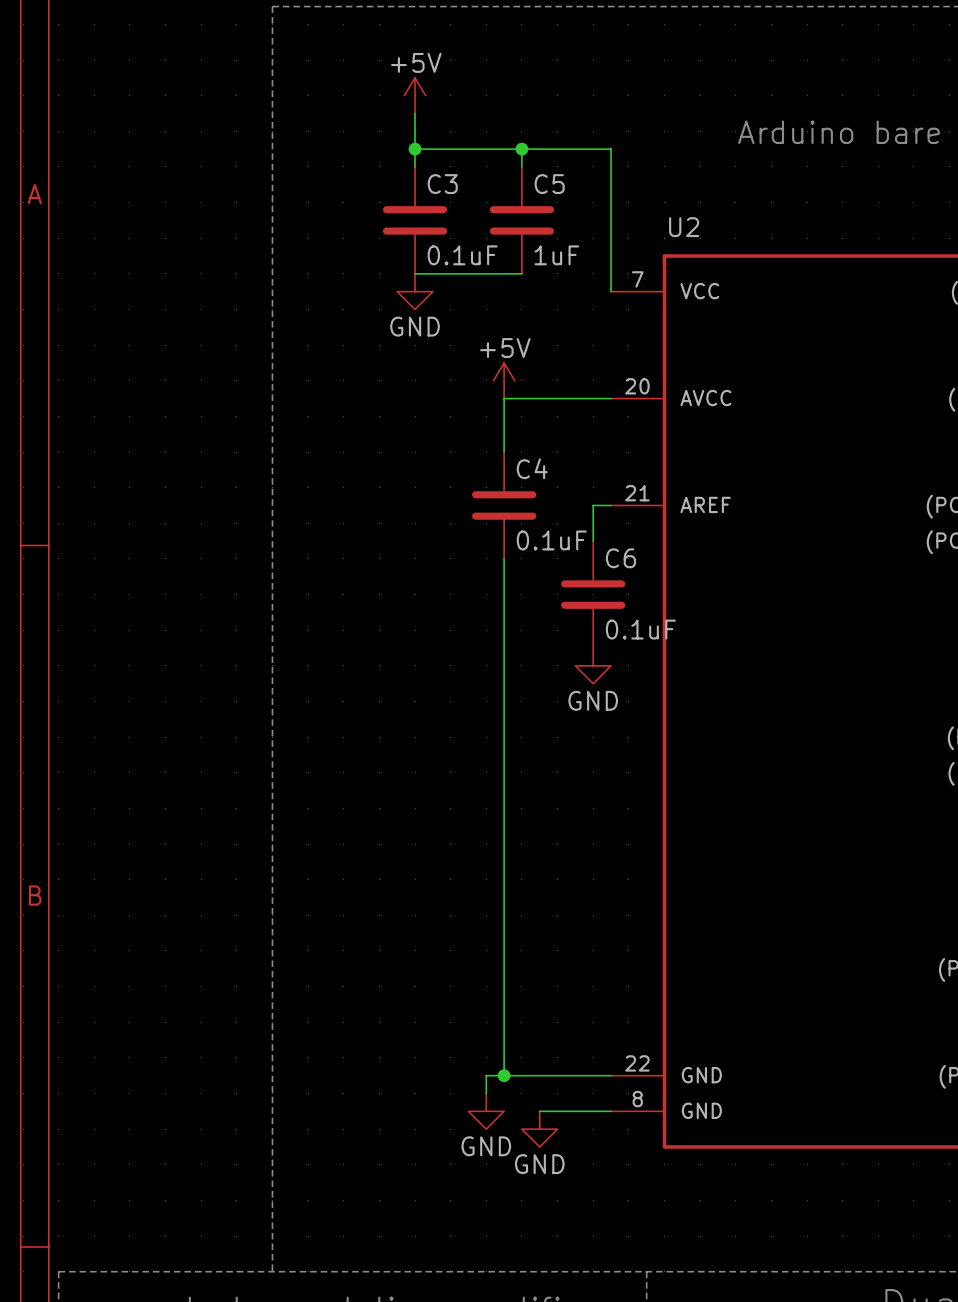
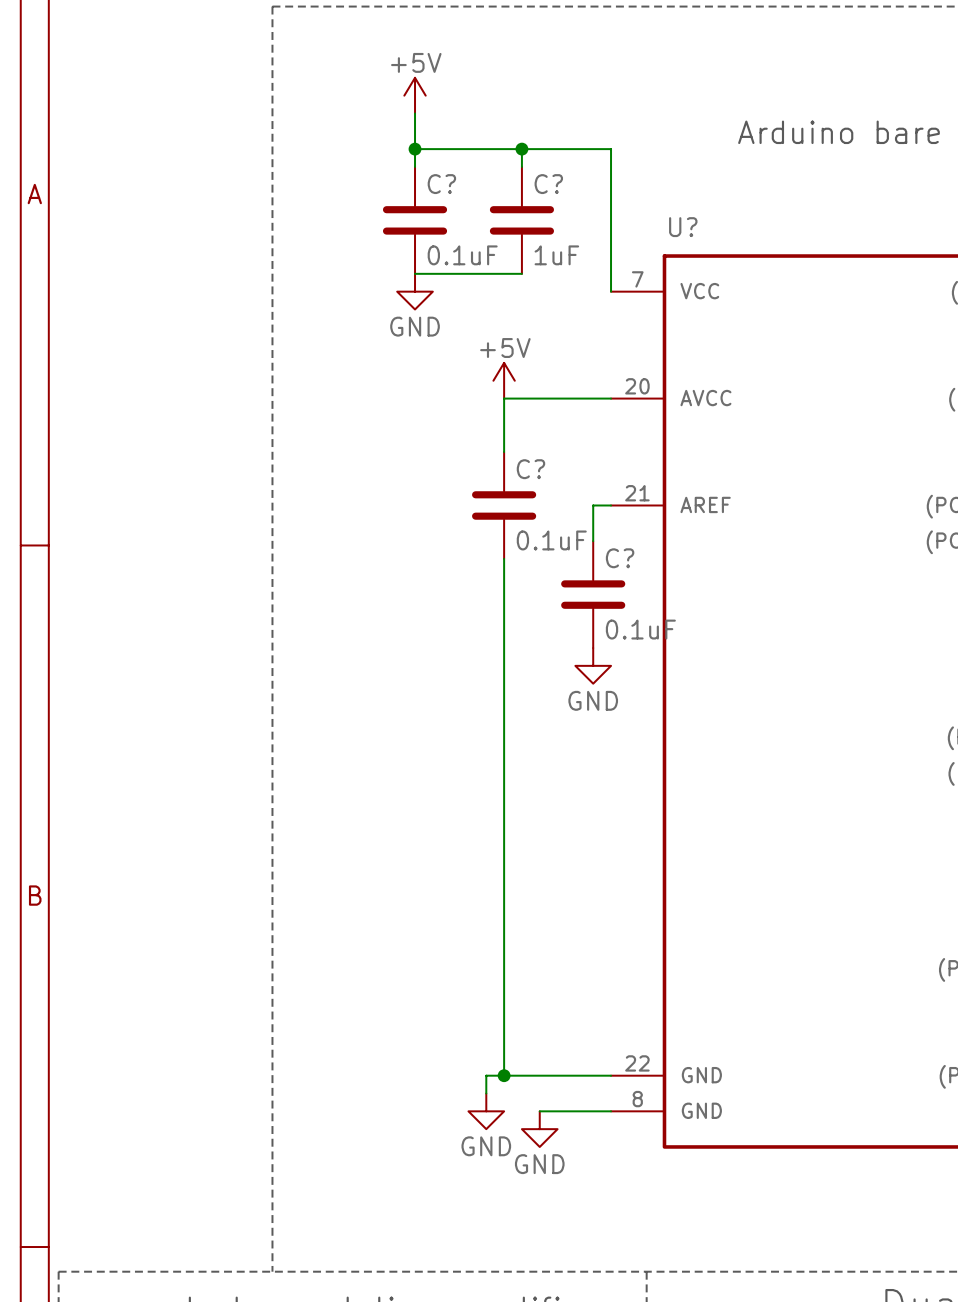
C3 name: C3 (442, 184) -> C? (441, 184)
C5 name: C5 (549, 184) -> C? (548, 184)
U2 name: U2 (684, 227) -> U? (683, 227)
C4 name: C4 (532, 468) -> C? (530, 469)
C6 name: C6 (620, 558) -> C? (620, 558)

